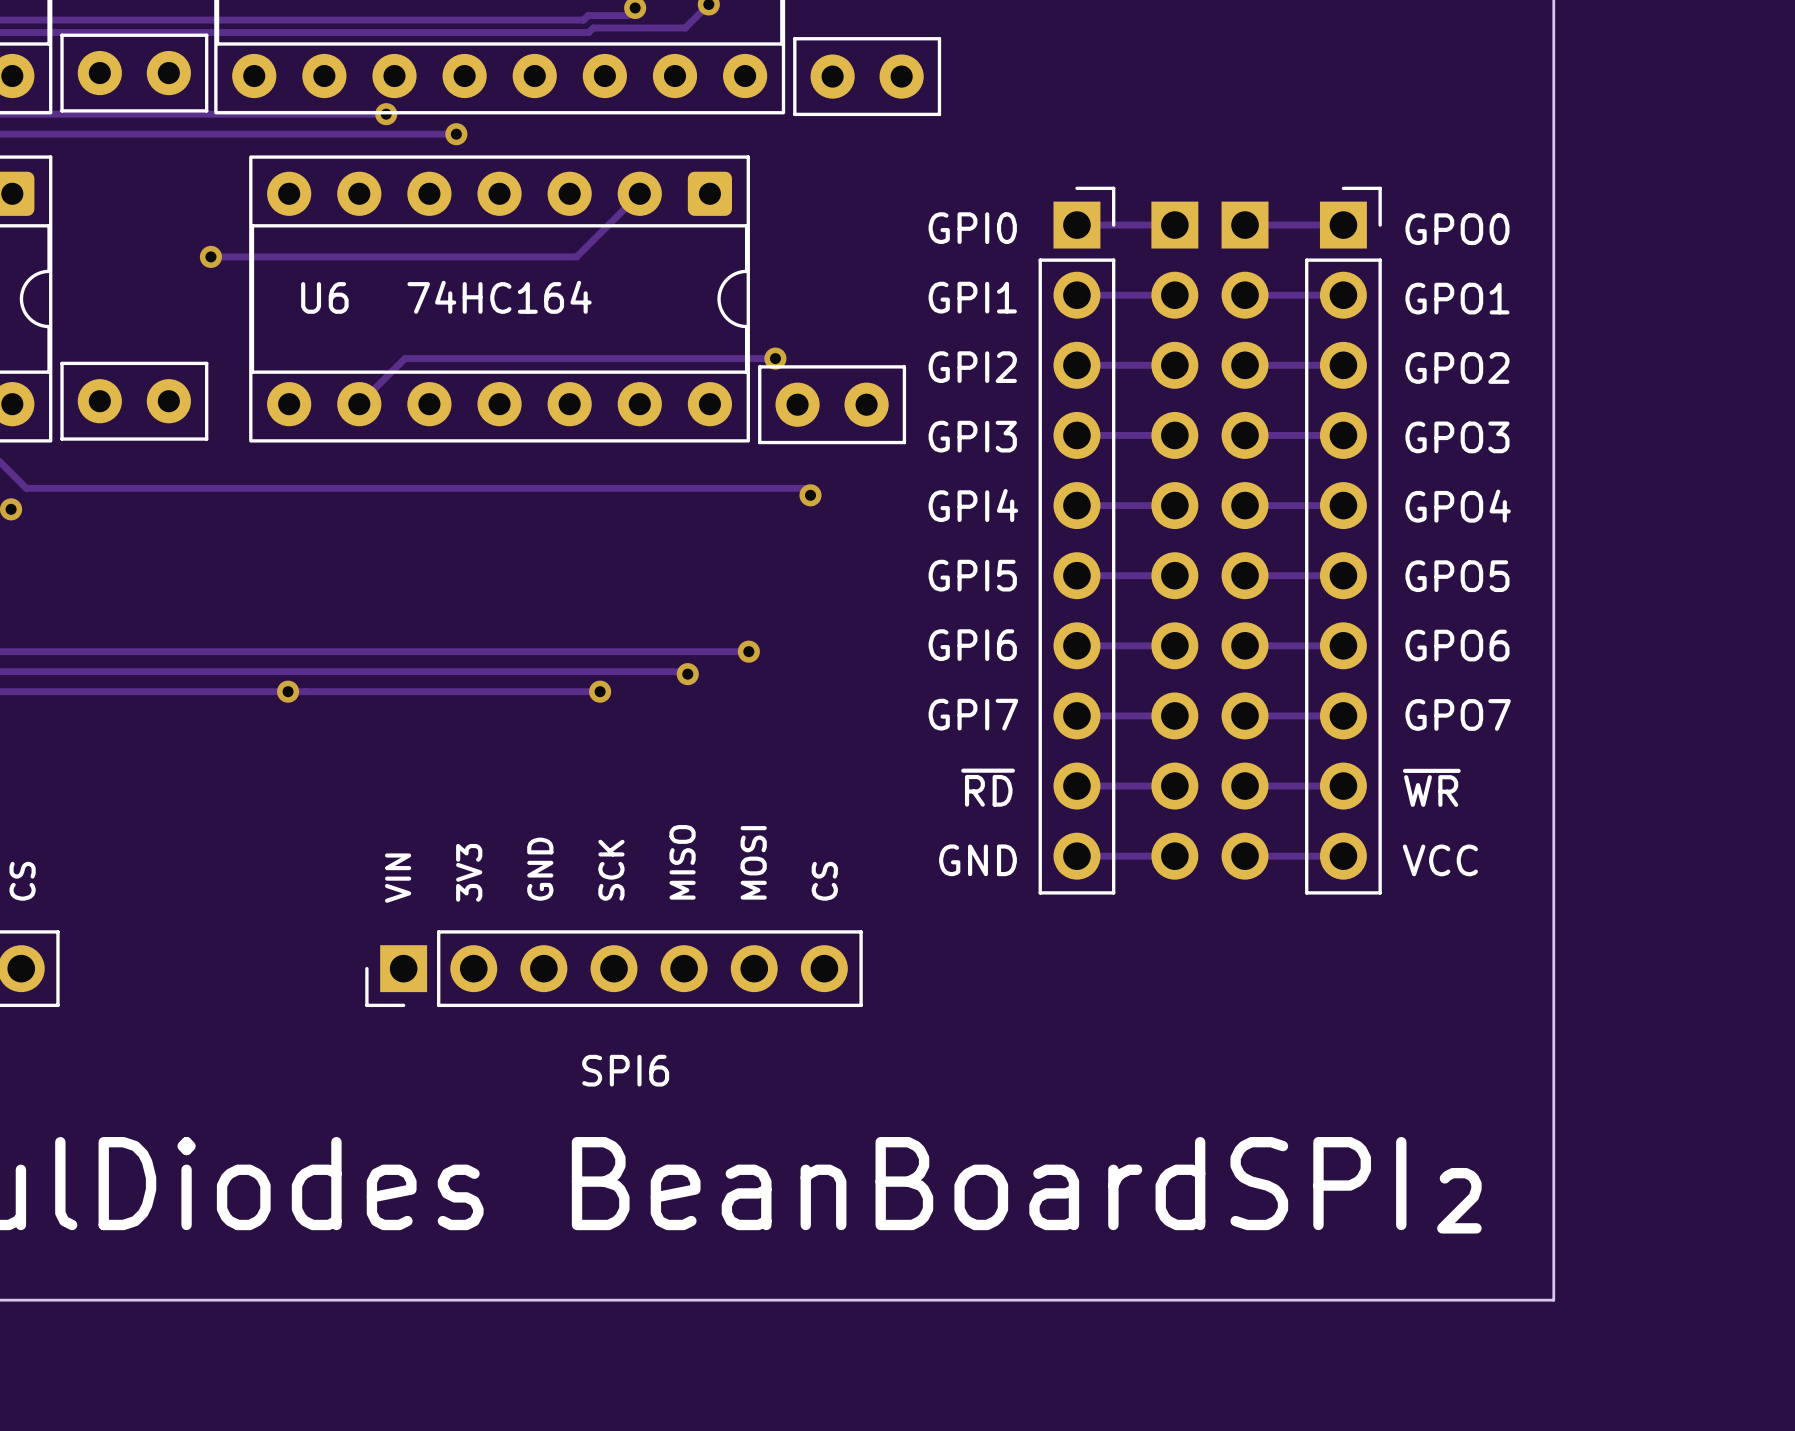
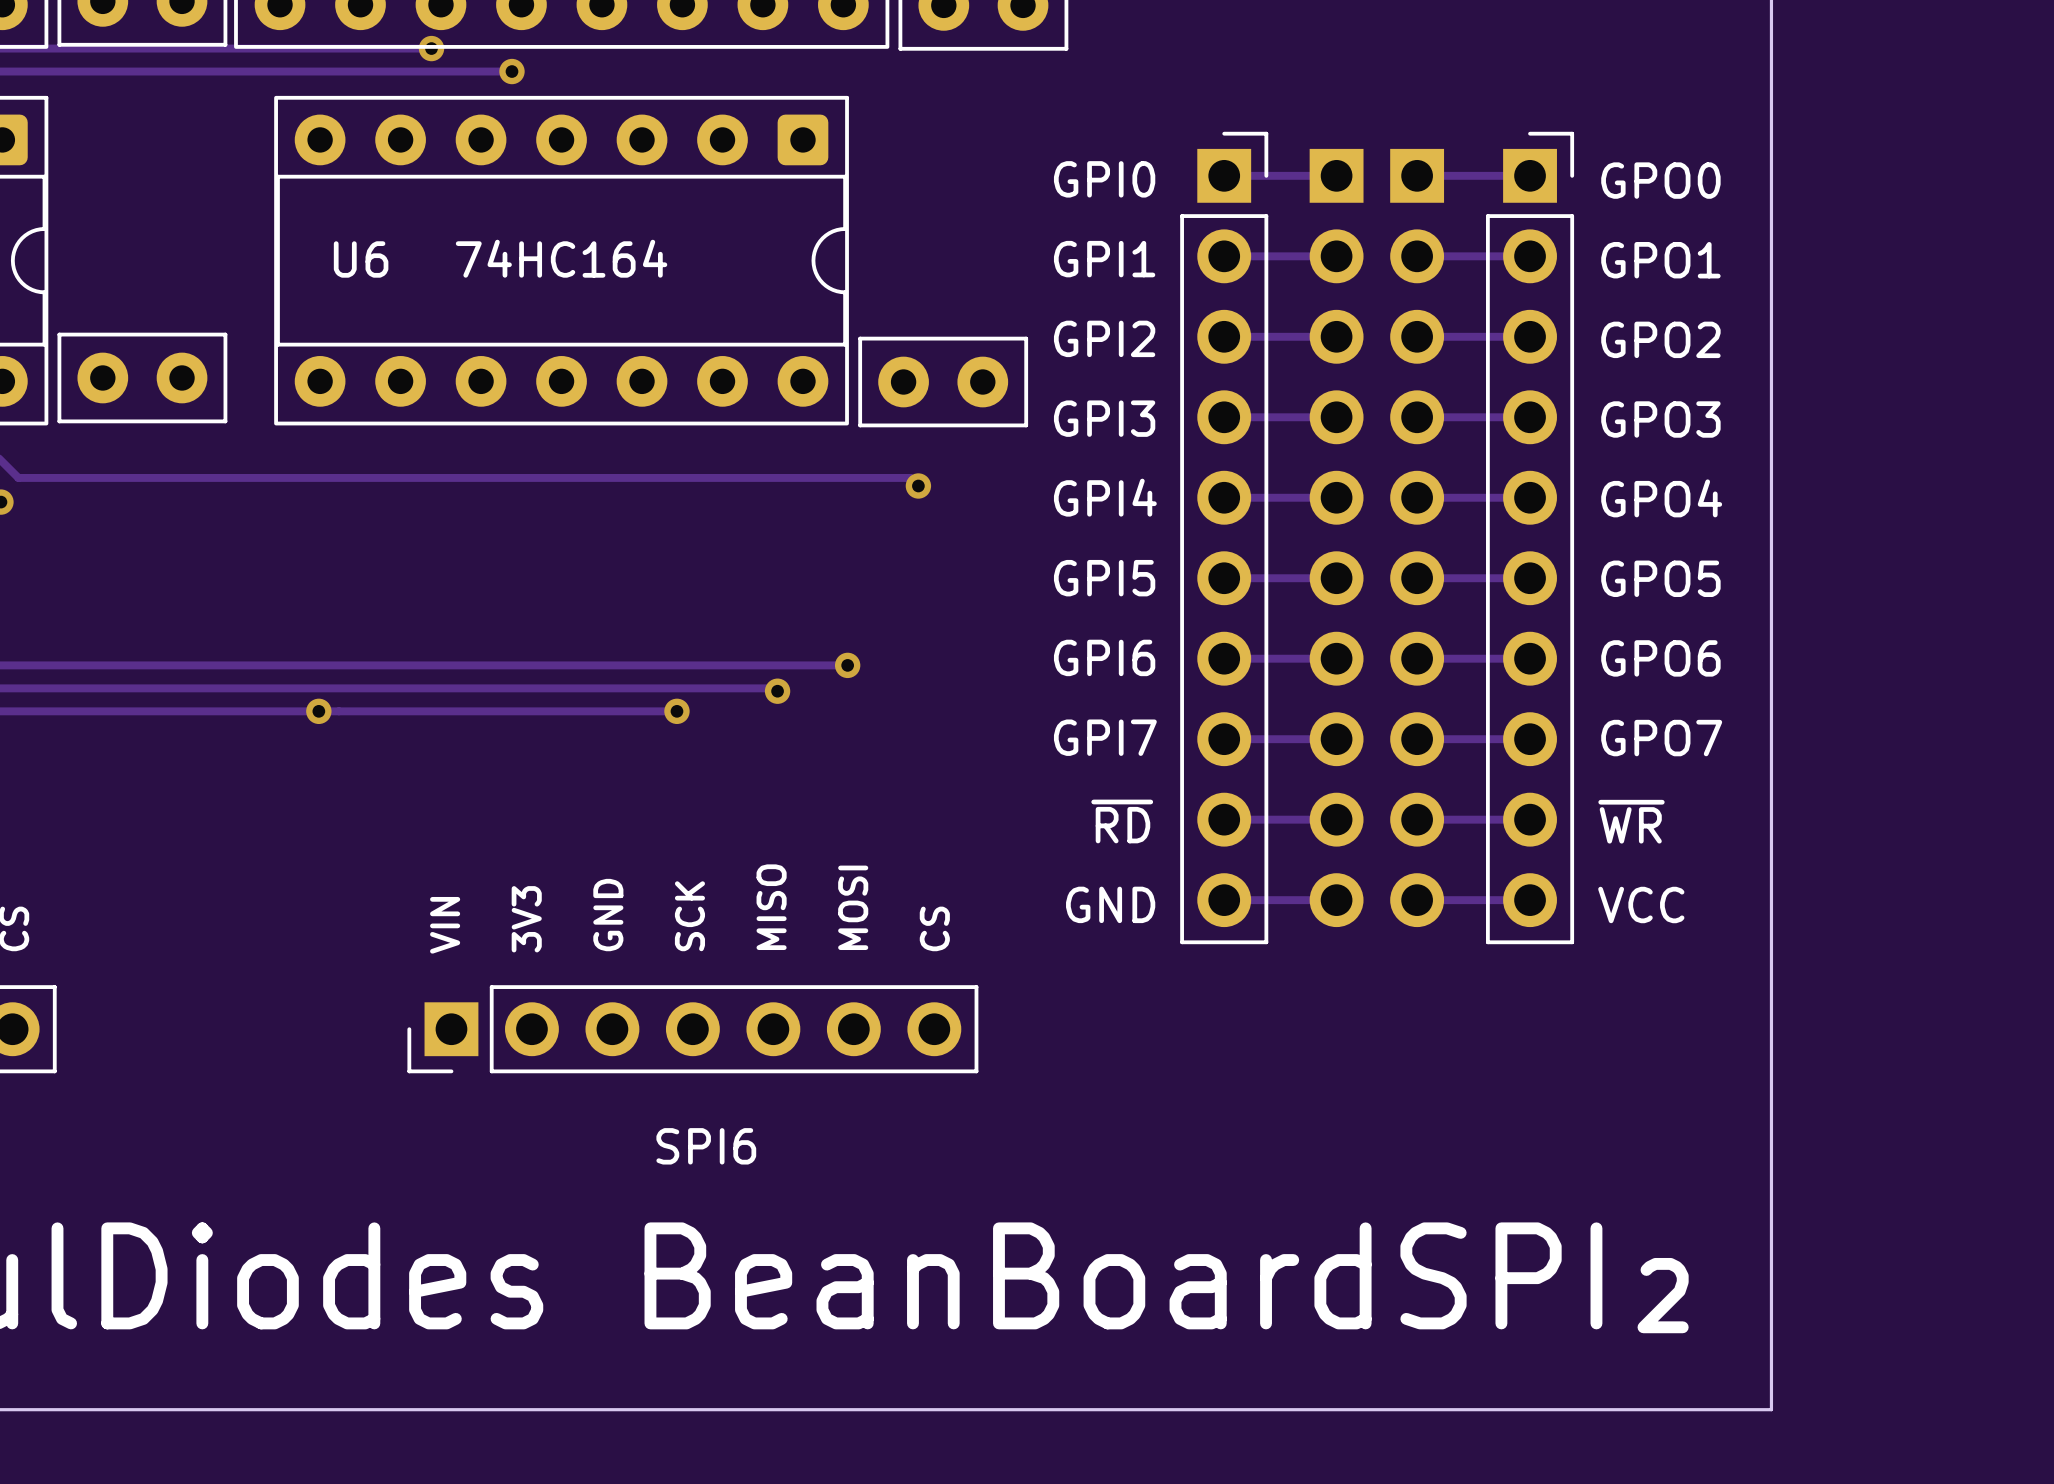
track: (639, 193) (576, 256) (210, 256) -> none
via: (210, 256) -> none
track: (775, 358) (404, 358) (359, 404) -> none
via: (775, 358) -> none

